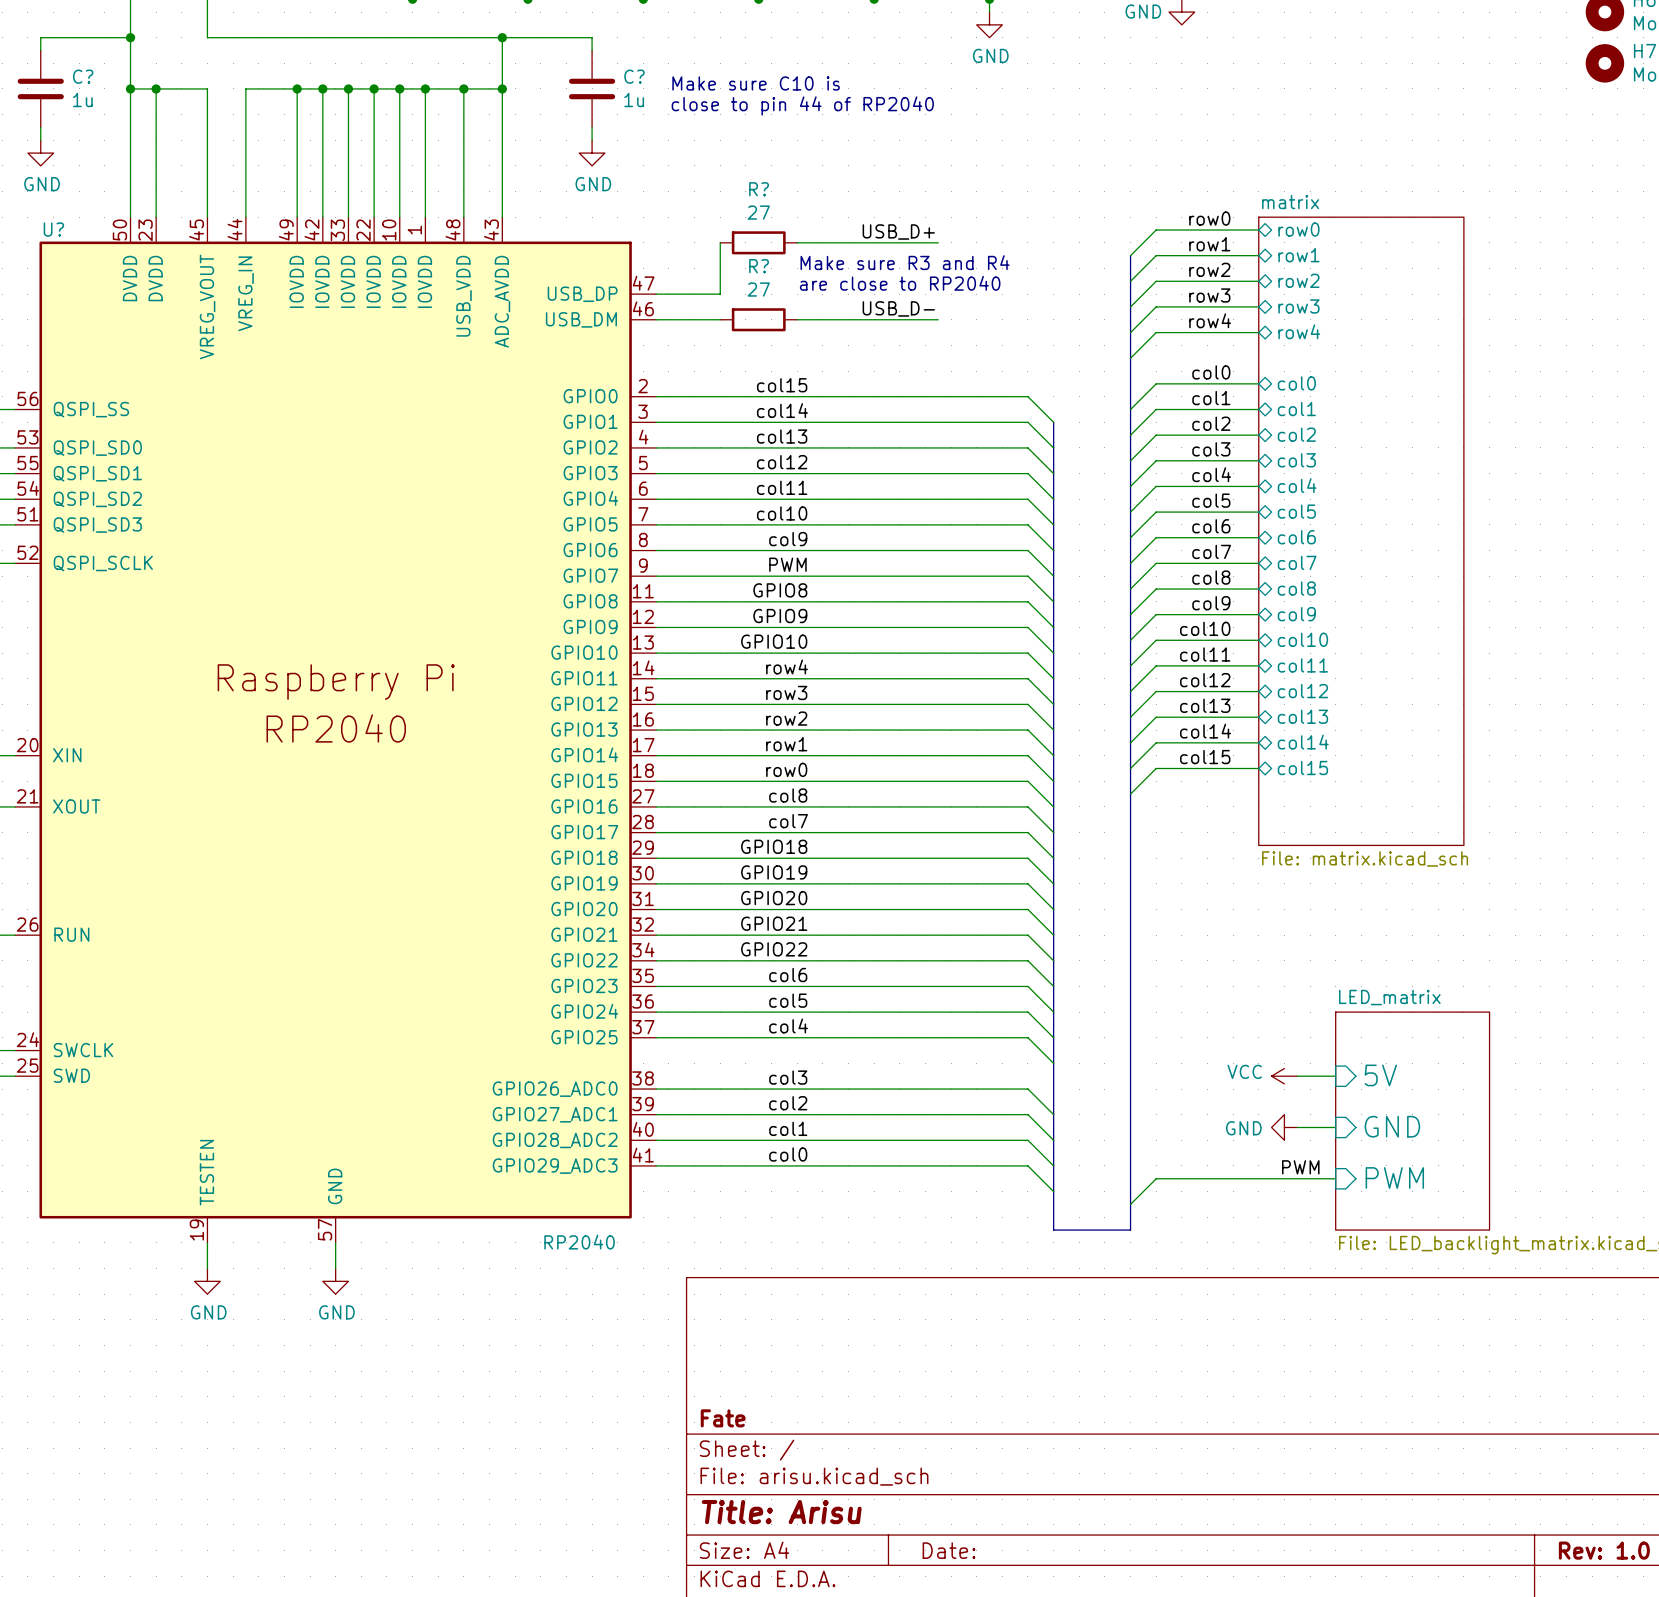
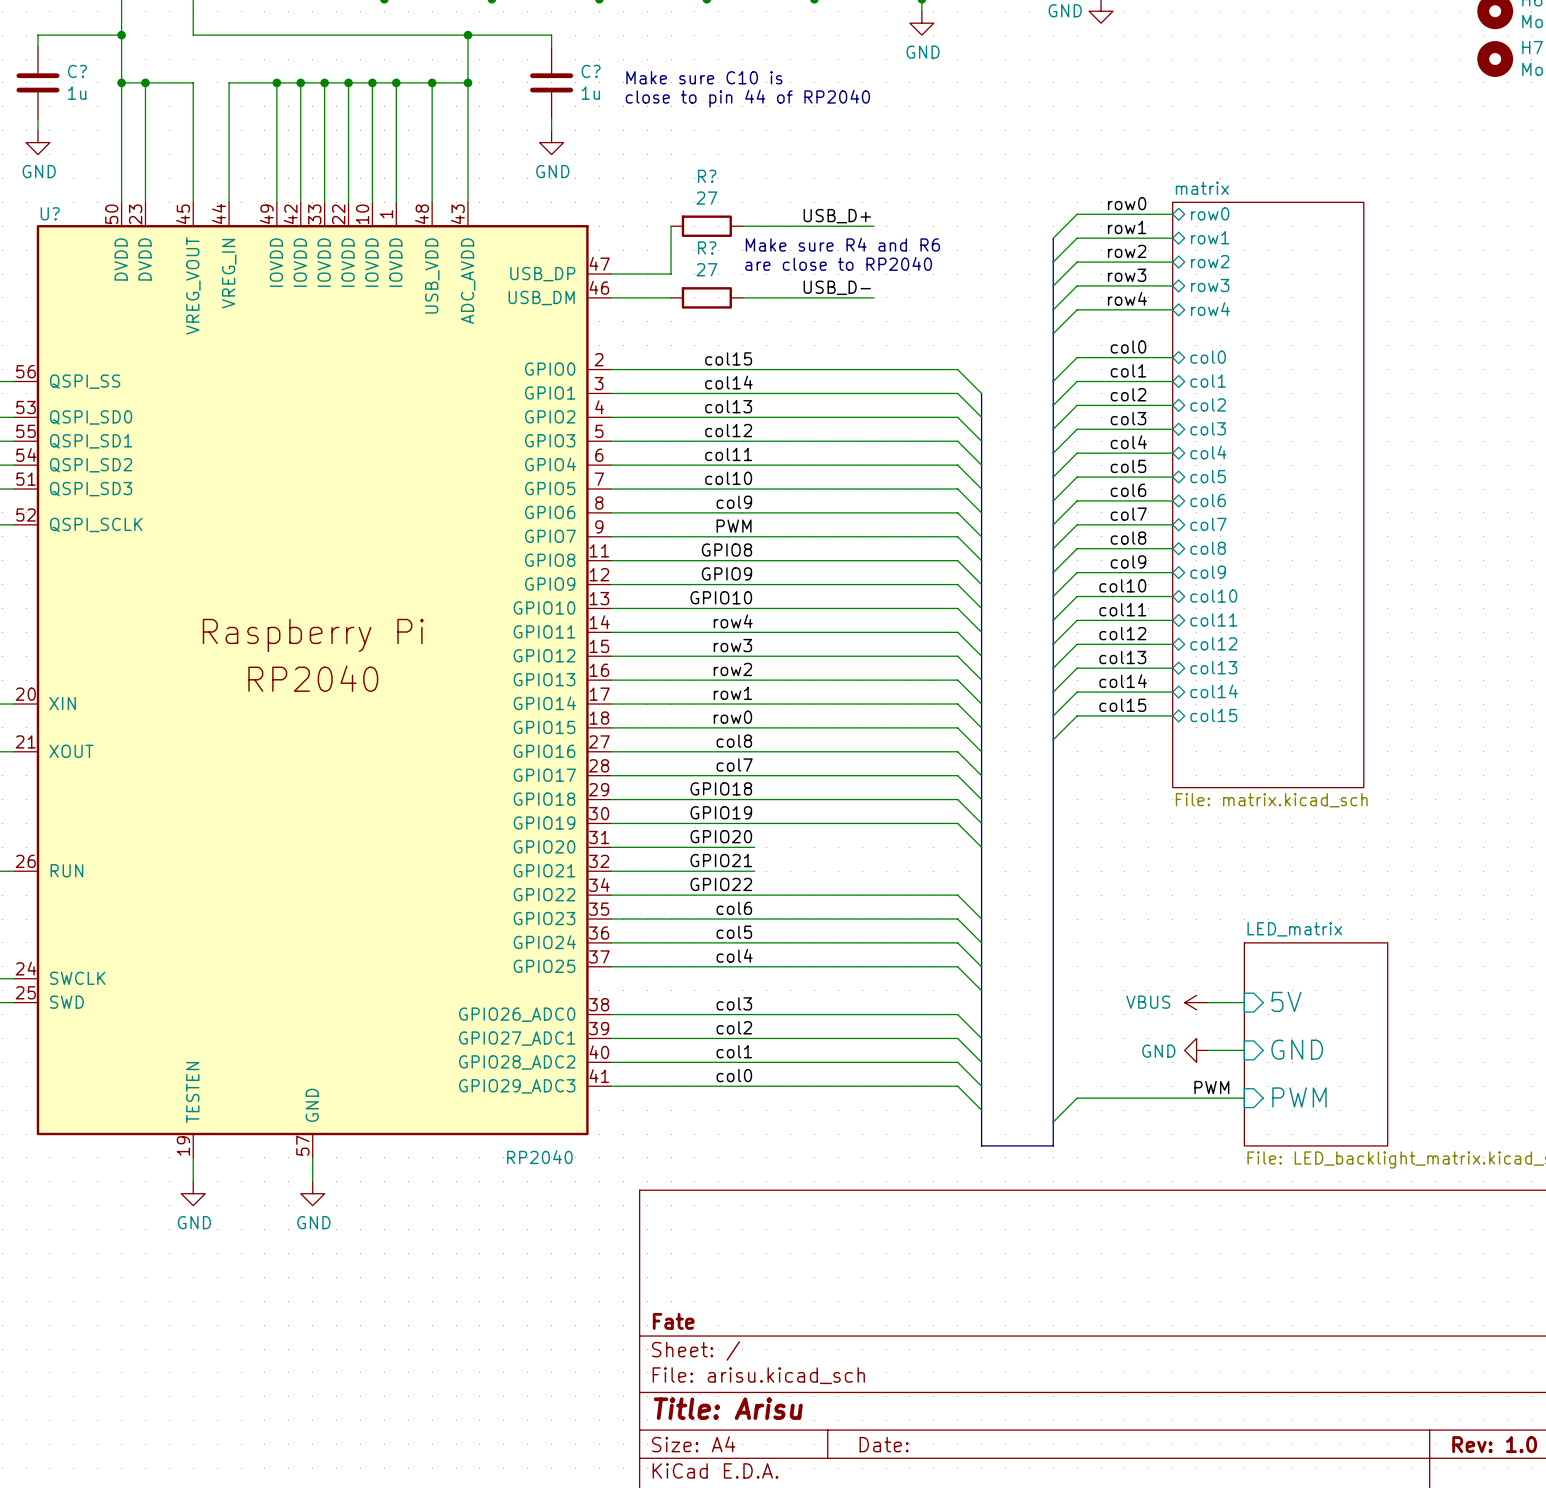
text: Make sure R3 and R4 (905, 262) -> Make sure R4 and R6 (842, 244)
wire: (810, 909) (1027, 909) (1053, 935) -> none
wire: (810, 935) (1027, 935) (1053, 960) -> none
power symbol: VCC (1284, 1076) -> VBUS (1196, 1002)

